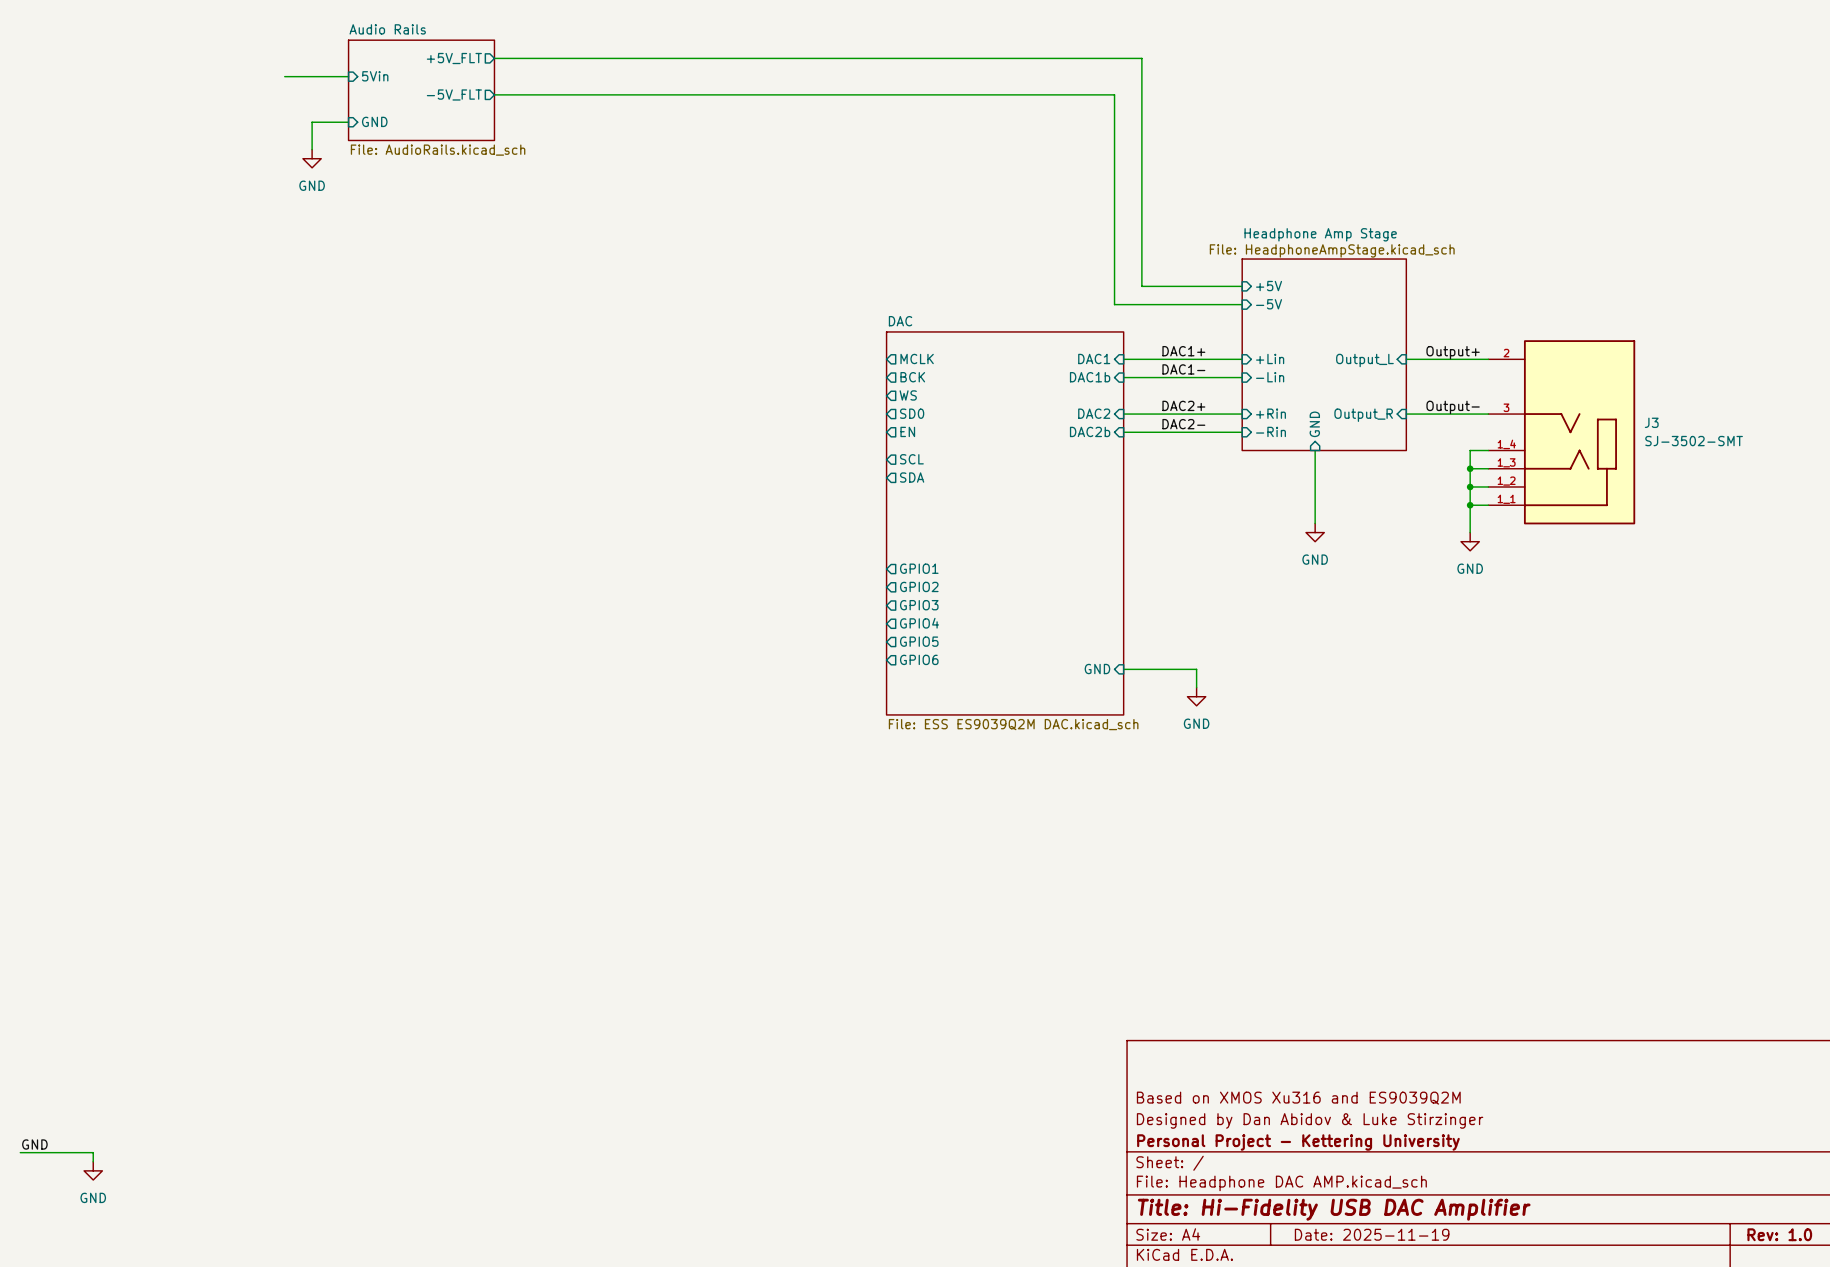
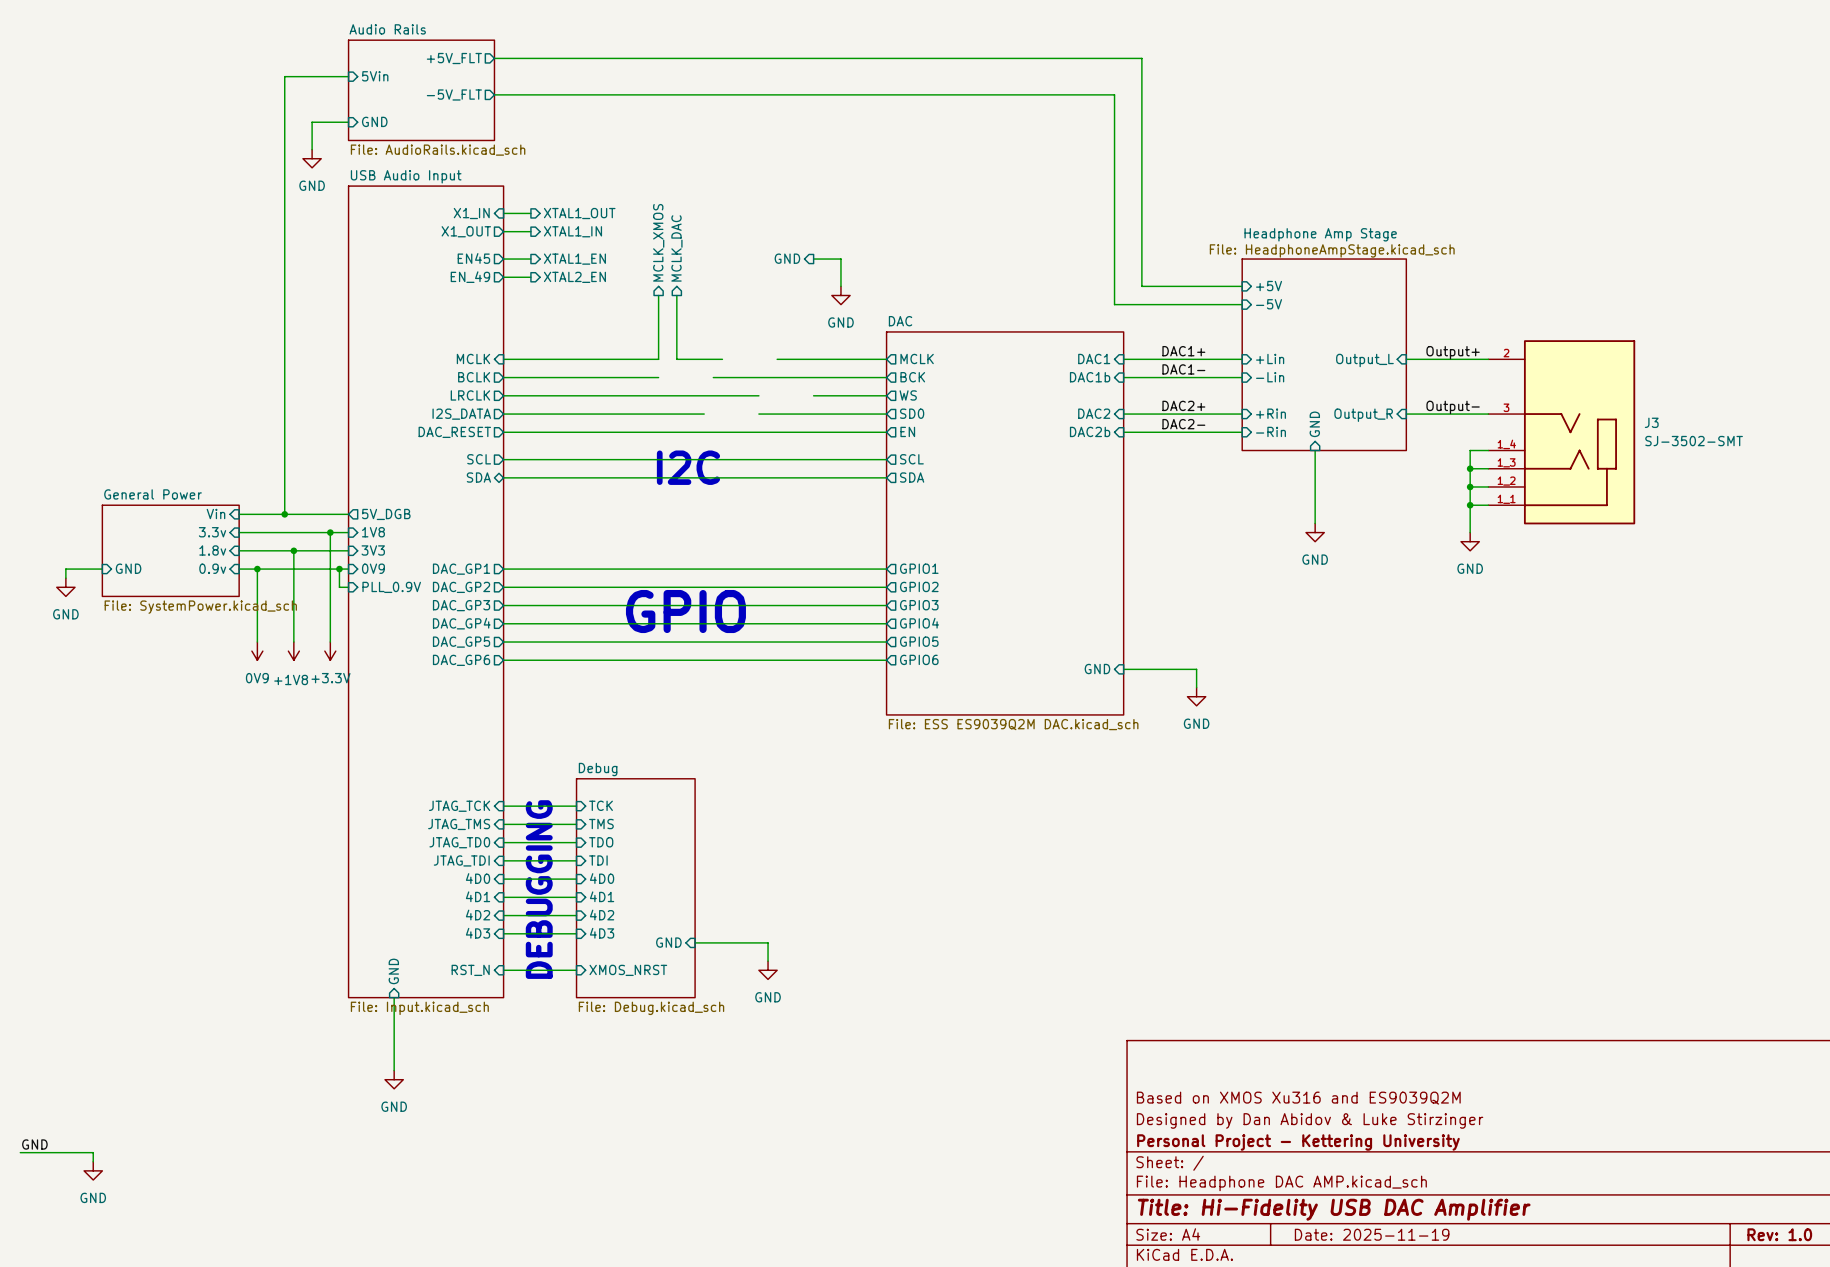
wire: none -> (284, 76) (284, 514)
sheet pin: none -> X1_IN (471, 213)
wire: none -> (503, 213) (530, 213)
sheet pin: none -> XTAL1_OUT (579, 213)
sheet pin: none -> X1_OUT (466, 231)
wire: none -> (503, 231) (530, 231)
sheet pin: none -> XTAL1_IN (572, 231)
sheet pin: none -> MCLK_XMOS (658, 242)
sheet pin: none -> MCLK_DAC (676, 248)
sheet pin: none -> EN45 (473, 258)
sheet pin: none -> GND (787, 258)
wire: none -> (503, 259) (530, 259)
sheet pin: none -> XTAL1_EN (574, 259)
wire: none -> (813, 259) (840, 259) (840, 286)
sheet pin: none -> EN_49 (470, 277)
wire: none -> (503, 277) (530, 277)
sheet pin: none -> XTAL2_EN (574, 277)
wire: none -> (658, 295) (658, 359) (503, 359)
wire: none -> (676, 295) (676, 359) (722, 359)
power symbol: none -> GND (840, 295)
sheet pin: none -> MCLK (473, 358)
wire: none -> (777, 359) (886, 359)
sheet pin: none -> BCLK (474, 377)
wire: none -> (503, 377) (658, 377)
wire: none -> (713, 377) (886, 377)
sheet pin: none -> LRCLK (470, 395)
wire: none -> (503, 395) (758, 395)
wire: none -> (813, 395) (886, 395)
sheet pin: none -> I2S_DATA (461, 414)
wire: none -> (503, 414) (704, 414)
wire: none -> (758, 414) (886, 414)
sheet pin: none -> DAC_RESET (454, 432)
wire: none -> (503, 432) (886, 432)
sheet pin: none -> SCL (479, 459)
wire: none -> (503, 459) (886, 459)
text: none -> I2C (688, 467)
sheet pin: none -> SDA (478, 477)
wire: none -> (503, 477) (886, 477)
sheet pin: none -> Vin (215, 514)
wire: none -> (239, 514) (348, 514)
junction: none -> (284, 514)
sheet pin: none -> 5V_DGB (386, 514)
sheet pin: none -> 3.3v (212, 532)
wire: none -> (239, 532) (348, 532)
wire: none -> (330, 532) (330, 642)
junction: none -> (330, 532)
sheet pin: none -> 1V8 (373, 532)
sheet General Power: none -> File: SystemPower.kicad_sch (170, 550)
sheet pin: none -> 1.8v (212, 550)
wire: none -> (239, 550) (348, 550)
wire: none -> (293, 550) (293, 642)
junction: none -> (293, 550)
sheet pin: none -> 3V3 (373, 550)
sheet pin: none -> GND (128, 568)
sheet pin: none -> 0.9v (212, 568)
sheet pin: none -> 0V9 (373, 568)
wire: none -> (102, 569) (65, 569) (65, 578)
wire: none -> (239, 569) (348, 569)
wire: none -> (257, 569) (257, 642)
junction: none -> (257, 569)
wire: none -> (339, 569) (339, 587) (348, 587)
junction: none -> (339, 569)
sheet pin: none -> DAC_GP1 (461, 569)
wire: none -> (503, 569) (886, 569)
power symbol: none -> GND (65, 587)
sheet pin: none -> PLL_0.9V (391, 587)
sheet pin: none -> DAC_GP2 (461, 587)
wire: none -> (503, 587) (886, 587)
sheet USB Audio Input: none -> File: Input.kicad_sch (426, 591)
sheet pin: none -> DAC_GP3 (461, 605)
wire: none -> (503, 605) (886, 605)
text: none -> GPIO (685, 611)
sheet pin: none -> DAC_GP4 (461, 623)
wire: none -> (503, 623) (886, 623)
sheet pin: none -> DAC_GP5 (461, 642)
wire: none -> (503, 642) (886, 642)
power symbol: none -> 0V9 (257, 651)
power symbol: none -> +1V8 (293, 651)
power symbol: none -> +3.3V (330, 651)
sheet pin: none -> DAC_GP6 (461, 660)
wire: none -> (503, 660) (886, 660)
sheet pin: none -> TCK (600, 805)
sheet pin: none -> JTAG_TCK (459, 806)
wire: none -> (503, 806) (576, 806)
sheet pin: none -> JTAG_TMS (459, 824)
wire: none -> (503, 824) (576, 824)
sheet pin: none -> TMS (601, 824)
sheet pin: none -> JTAG_TD0 (459, 842)
wire: none -> (503, 842) (576, 842)
sheet pin: none -> TDO (601, 842)
sheet pin: none -> JTAG_TDI (461, 860)
wire: none -> (503, 860) (576, 860)
sheet pin: none -> TDI (598, 860)
sheet pin: none -> 4D0 (478, 878)
sheet pin: none -> 4D0 (602, 878)
wire: none -> (503, 879) (576, 879)
sheet Debug: none -> File: Debug.kicad_sch (635, 888)
text: none -> DEBUGGING (539, 889)
sheet pin: none -> 4D1 (478, 896)
sheet pin: none -> 4D1 (602, 896)
wire: none -> (503, 897) (576, 897)
sheet pin: none -> 4D2 (478, 915)
wire: none -> (503, 915) (576, 915)
sheet pin: none -> 4D2 (602, 915)
sheet pin: none -> 4D3 (478, 933)
wire: none -> (503, 933) (576, 933)
sheet pin: none -> 4D3 (602, 933)
sheet pin: none -> GND (668, 942)
wire: none -> (695, 942) (768, 942) (768, 961)
sheet pin: none -> RST_N (470, 970)
wire: none -> (503, 970) (576, 970)
sheet pin: none -> XMOS_NRST (628, 970)
power symbol: none -> GND (768, 970)
sheet pin: none -> GND (393, 971)
wire: none -> (394, 997) (394, 1070)
power symbol: none -> GND (394, 1079)

